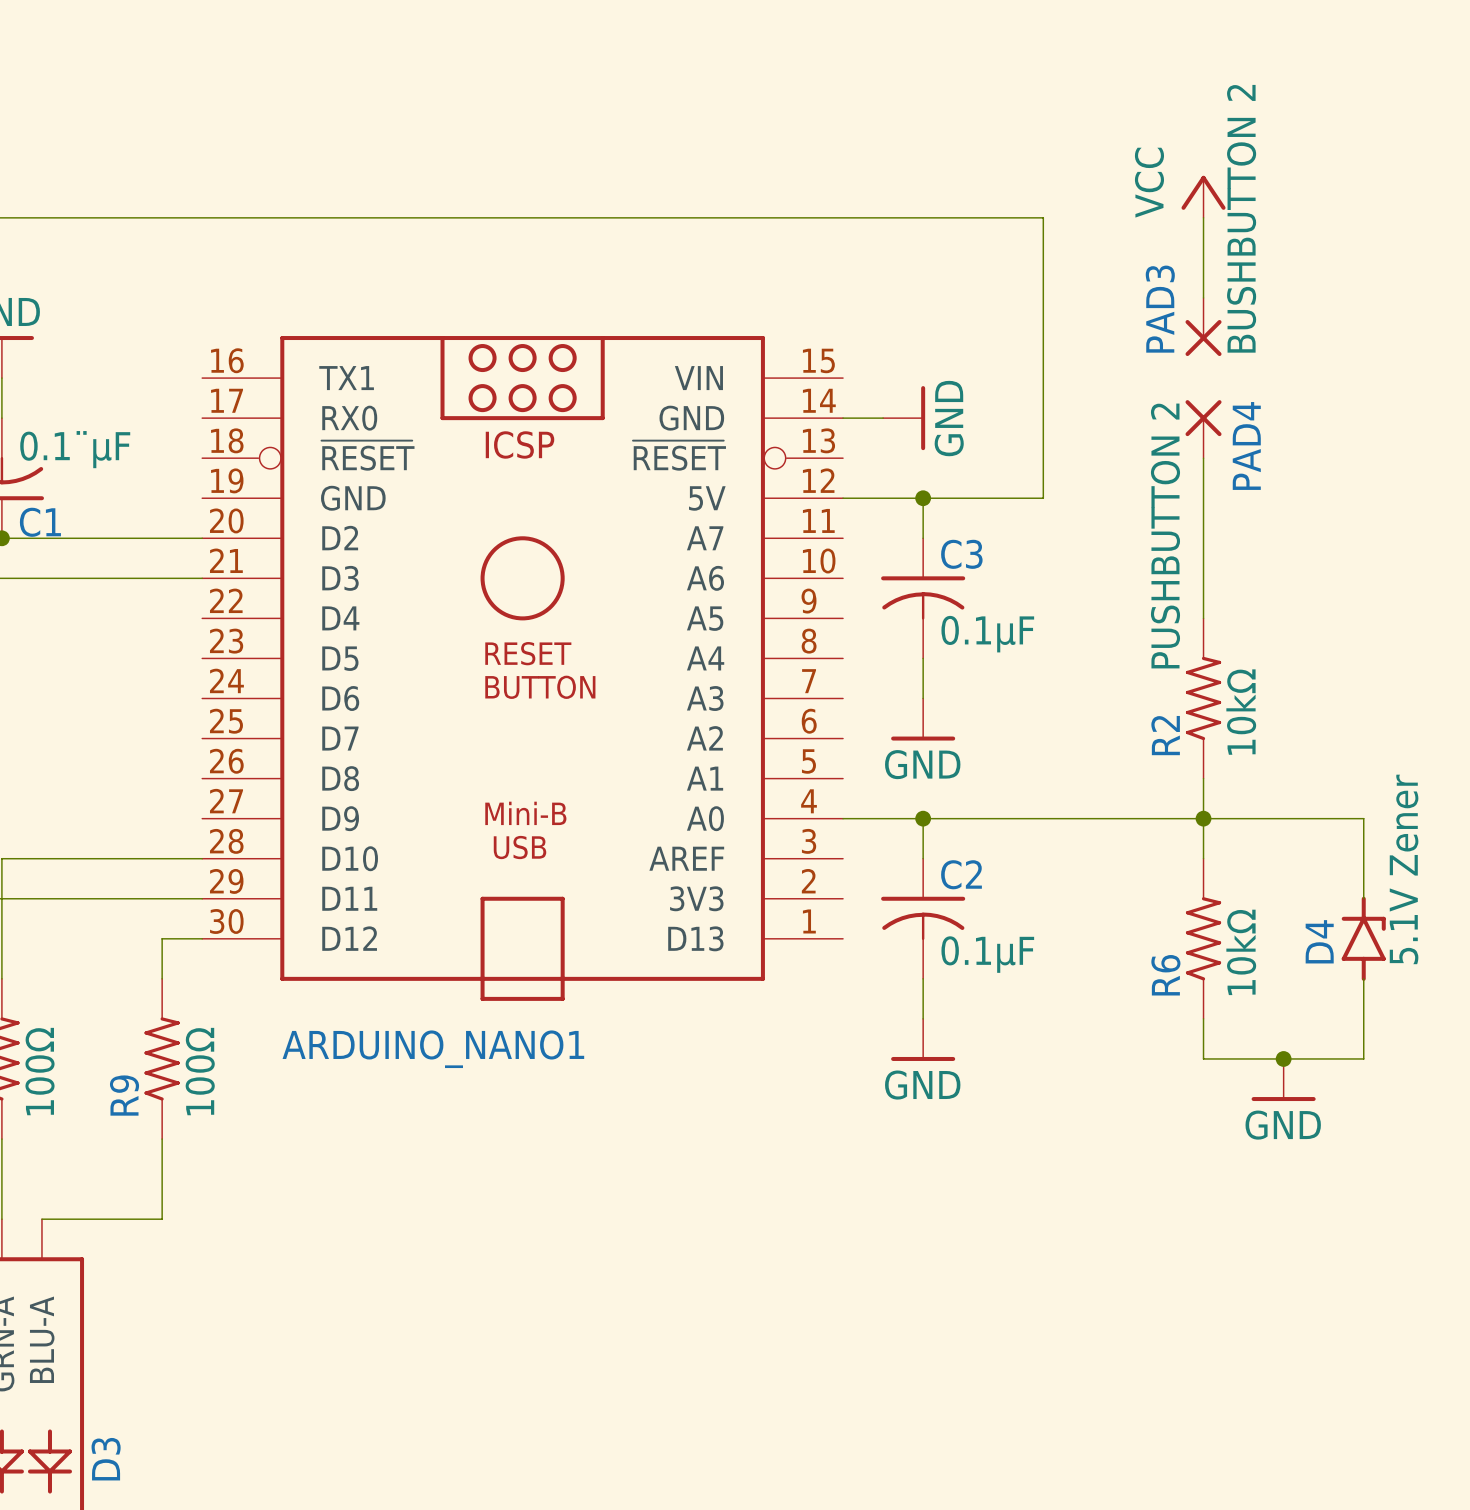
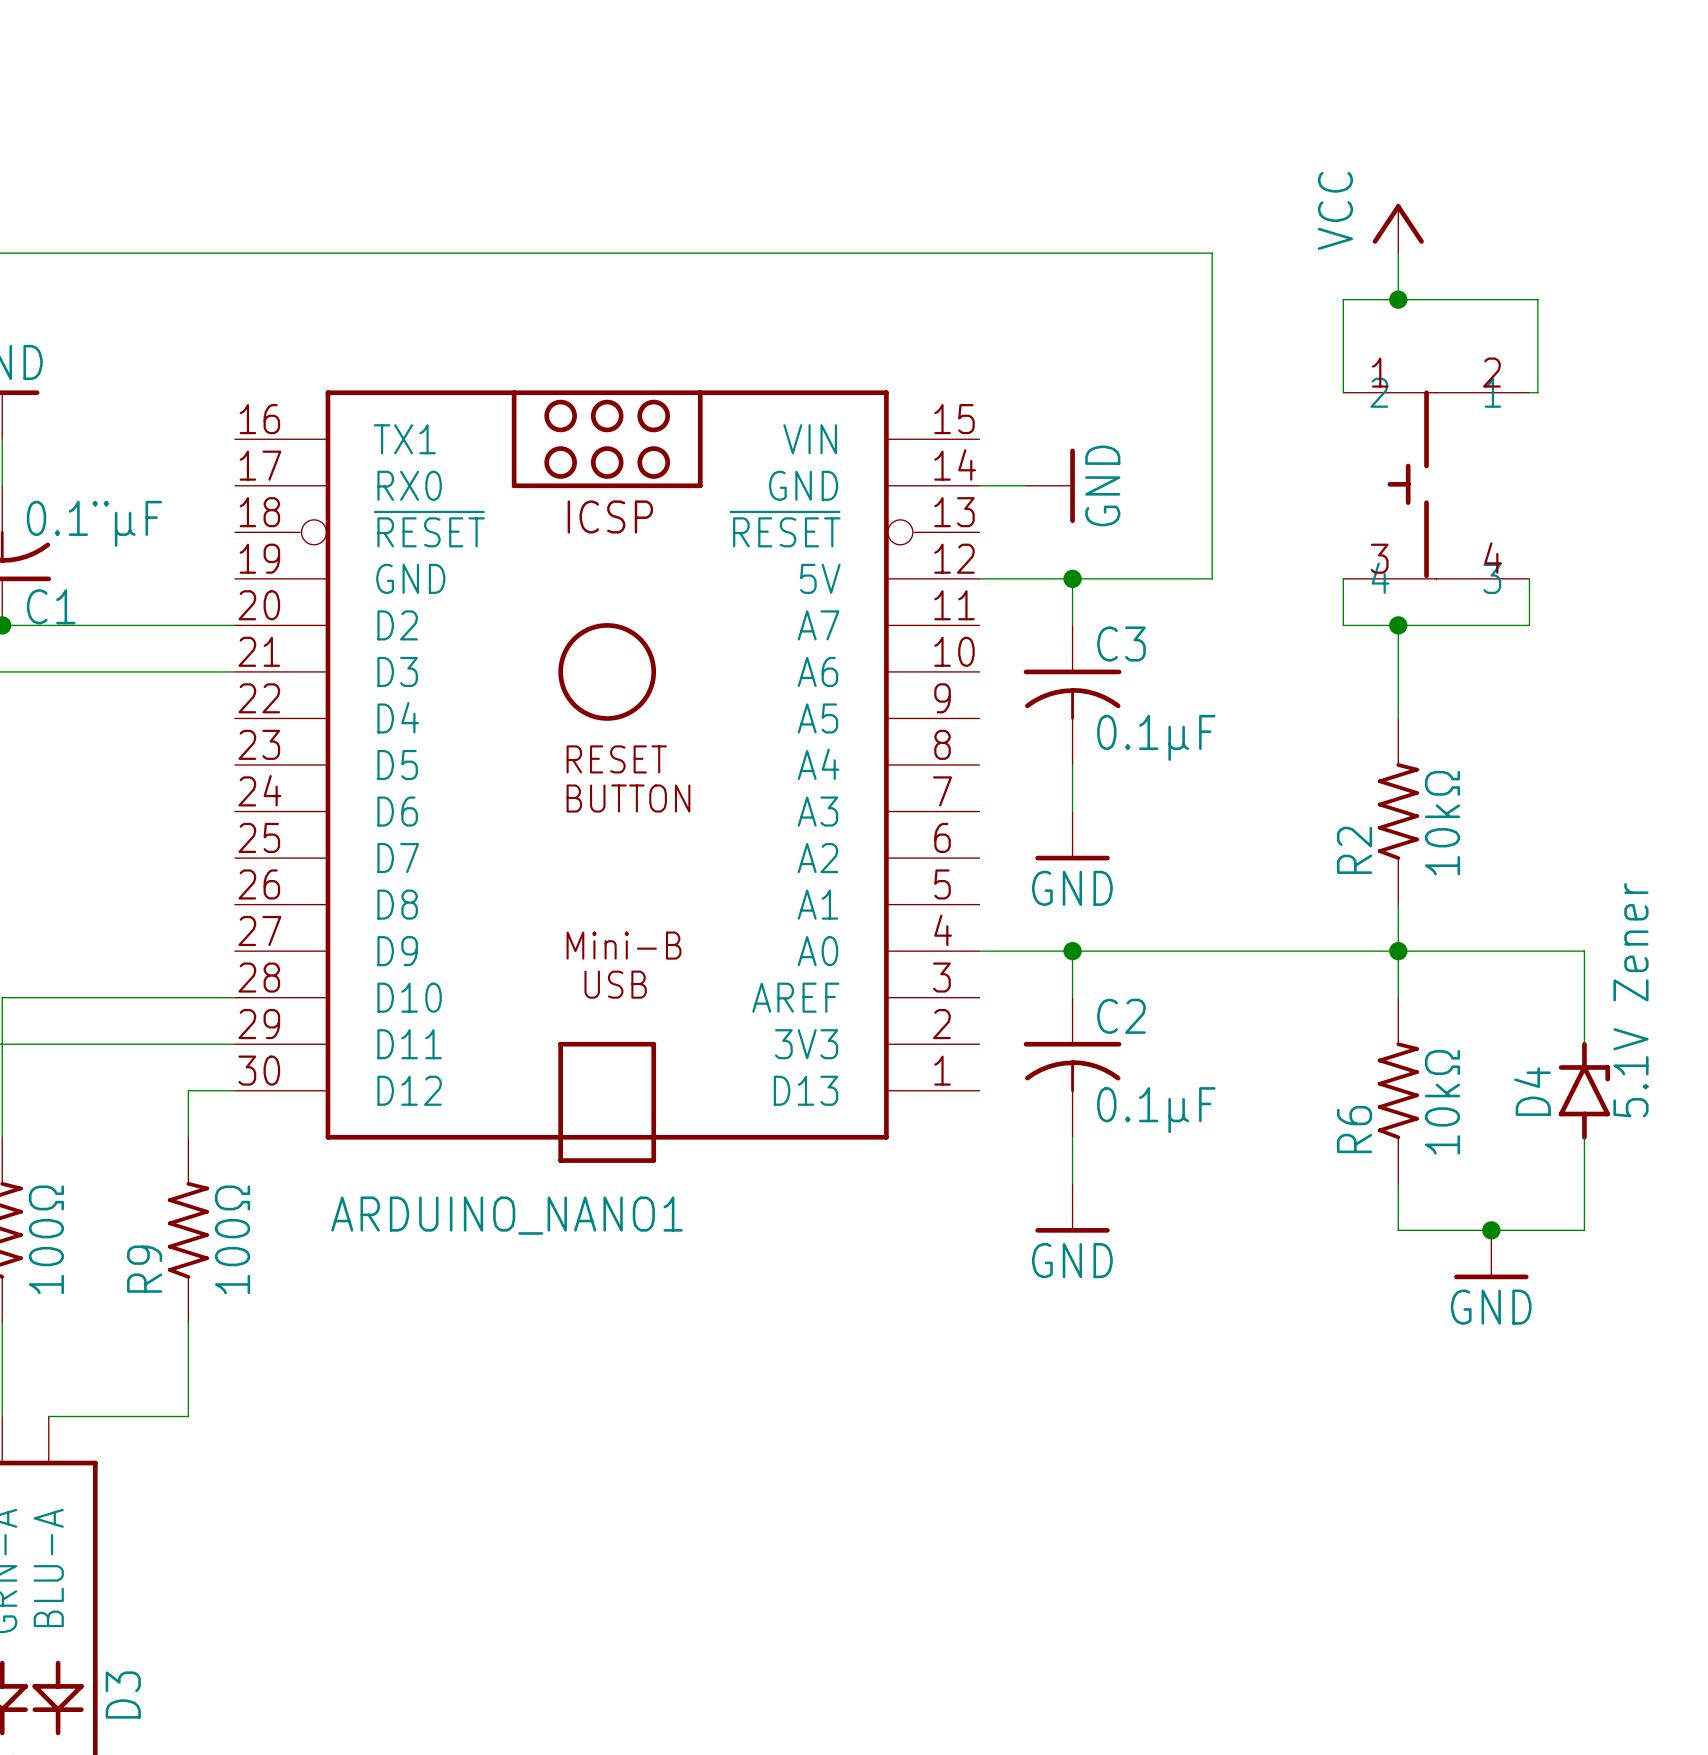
wire: (1203, 257) (1203, 297) -> none
junction: none -> (1398, 299)
PAD3: BUSHBUTTON 2 (1203, 327) -> none
wire: none -> (1343, 392) (1343, 299) (1537, 299) (1537, 392) (1529, 392)
part: none -> (1436, 484)
PAD4: PUSHBUTTON 2 (1203, 429) -> none
wire: (1203, 458) (1203, 538) -> none
wire: none -> (1343, 578) (1343, 625) (1529, 625) (1529, 578)
junction: none -> (1398, 625)

